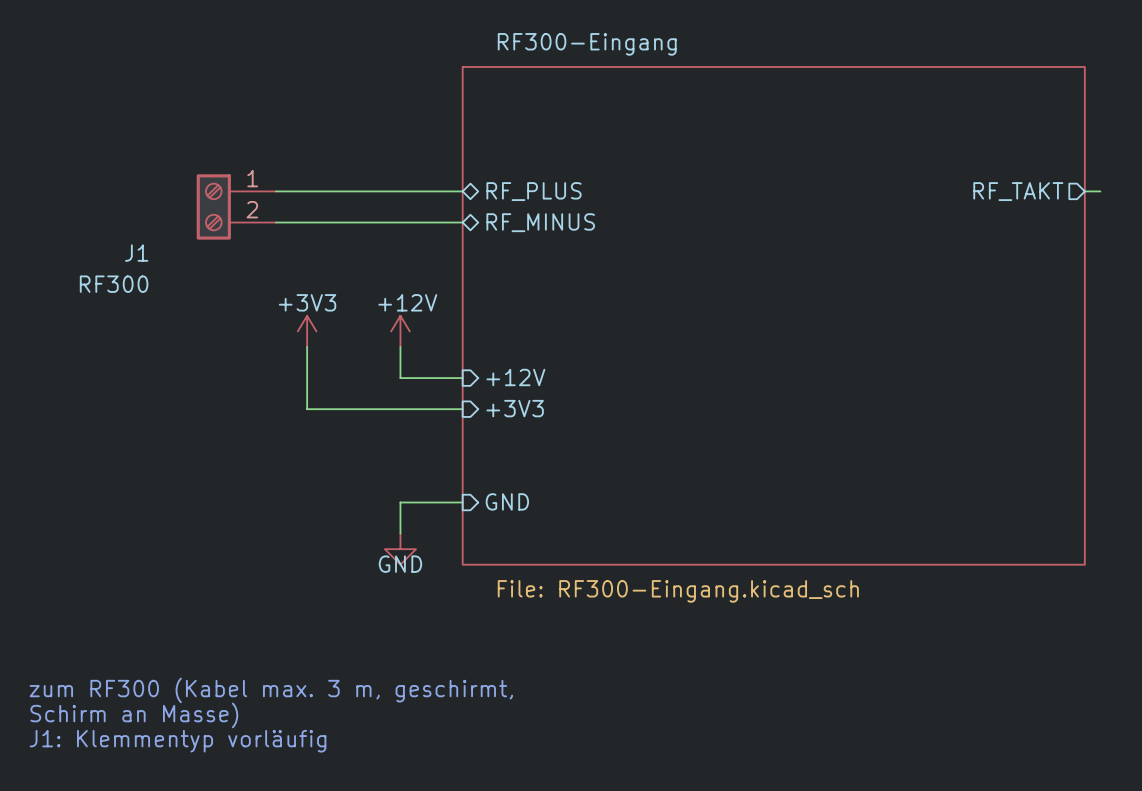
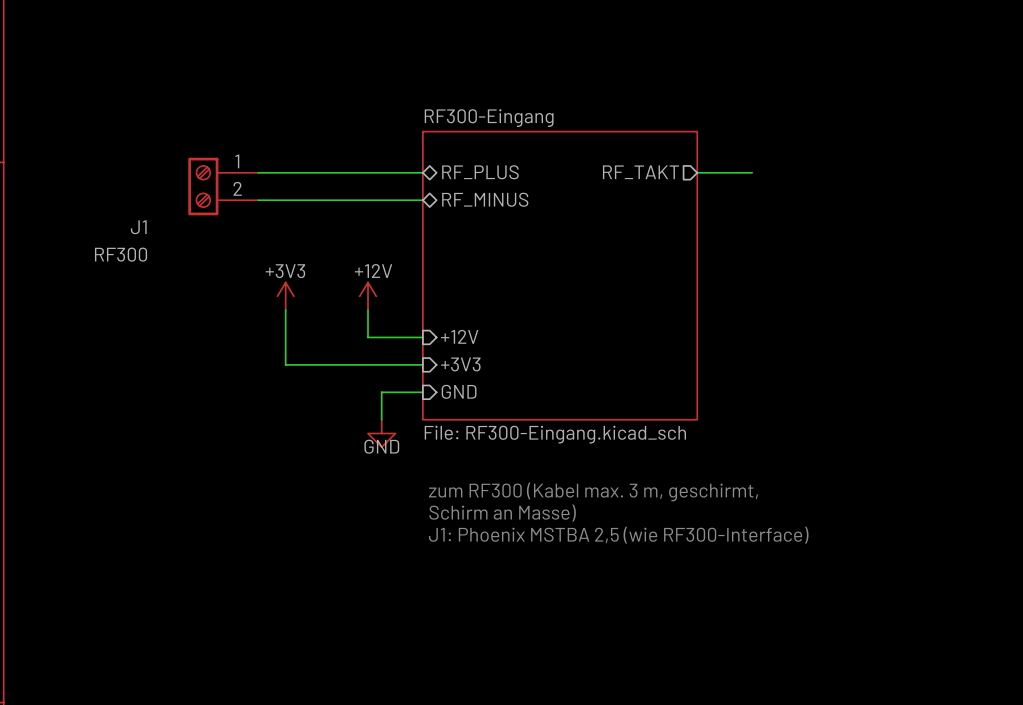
sheet RF300-Eingang name position: RF300-Eingang (587, 44) -> RF300-Eingang (489, 118)
sheet RF300-Eingang shape: [462, 66, 1085, 565] -> [422, 131, 698, 420]
sheet pin: none -> RF_TAKT (640, 172)
wire: none -> (697, 172) (752, 172)
sheet pin: RF_TAKT (1018, 191) -> none
wire: (1084, 191) (1100, 191) -> none
wire: none -> (422, 392) (381, 392) (381, 419)
sheet pin position: GND (507, 501) -> GND (459, 391)
wire: (462, 502) (400, 502) (400, 533) -> none
power symbol position: GND (400, 549) -> GND (381, 433)
text: none -> zum RF300 (Kabel max. 3 m, geschirmt, (593, 491)
text: none -> Schirm an Masse) (502, 513)
sheet RF300-Eingang value position: File: RF300-Eingang.kicad_sch (678, 591) -> File: RF300-Eingang.kicad_sch (555, 434)
text: none -> J1: Phoenix MSTBA 2,5 (wie RF300-Interface) (618, 535)
text: zum RF300 (Kabel max. 3 m, geschirmt, (271, 690) -> none
text: Schirm an Masse) (134, 715) -> none
text: J1: Klemmentyp vorläufig (178, 741) -> none

